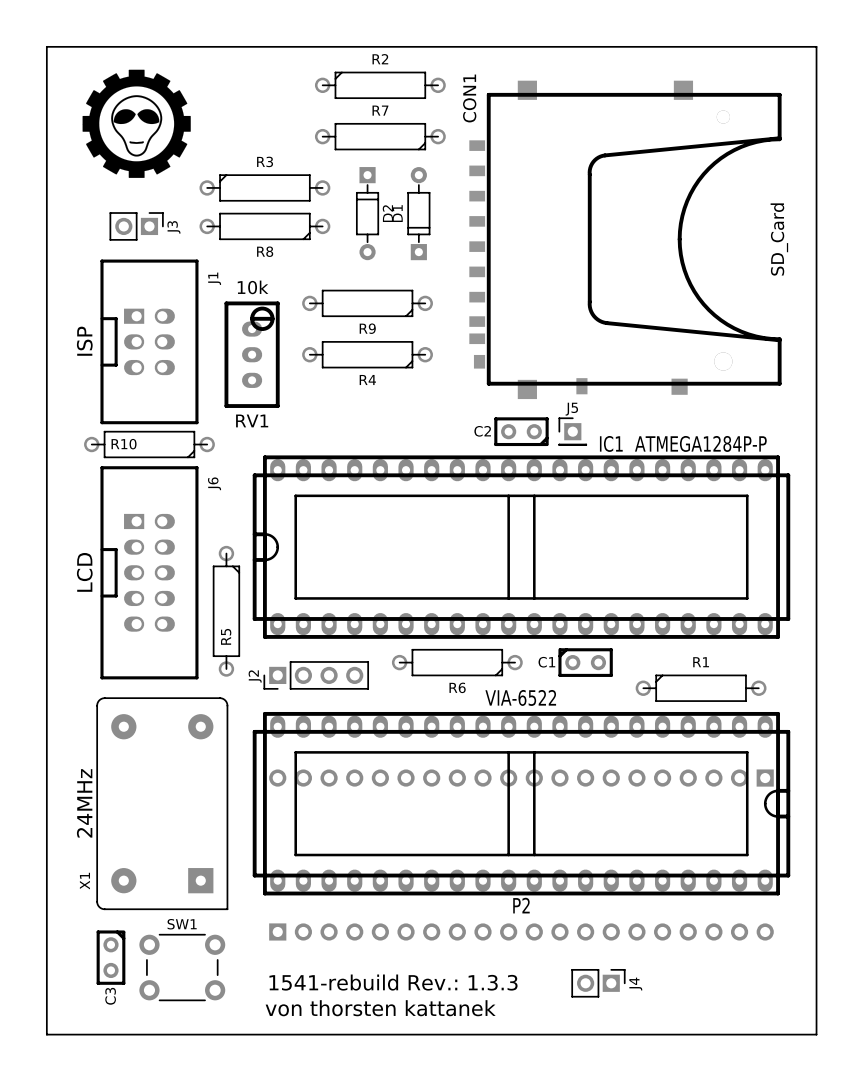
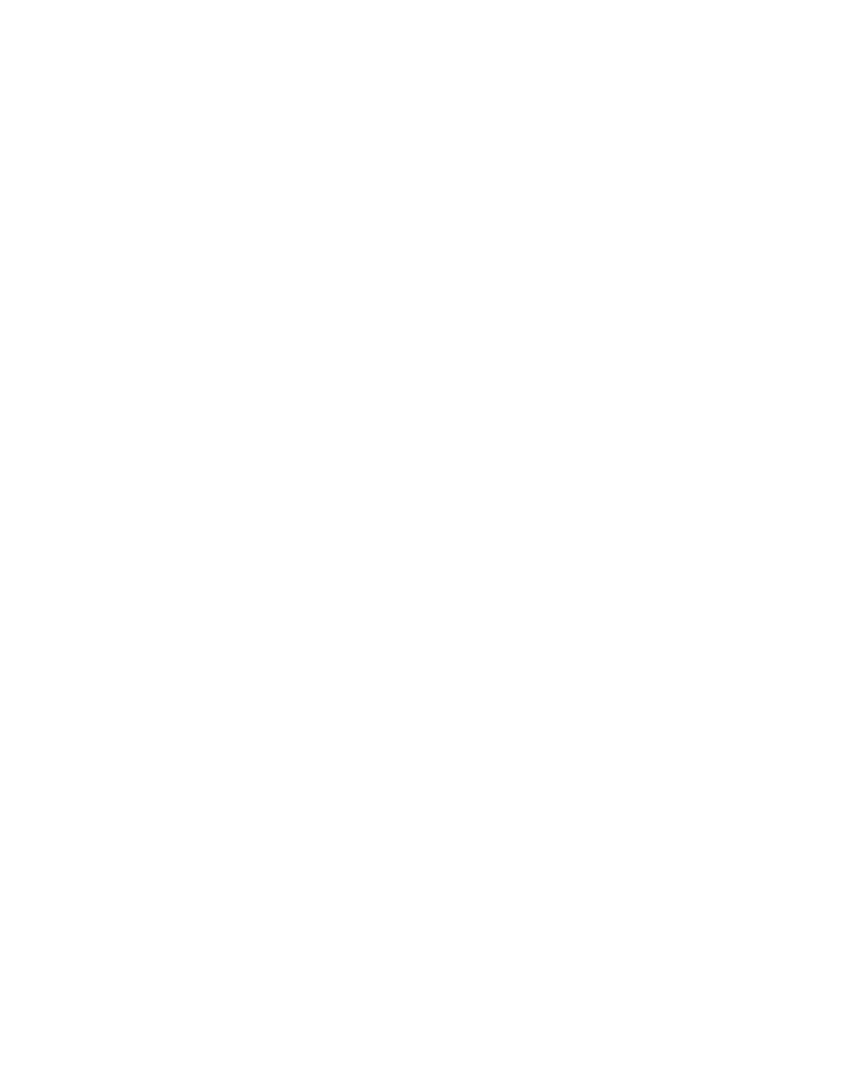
board edge: (46, 46) (816, 46) (816, 1034) (46, 1034) (46, 46) -> none
drawing: [82, 69, 191, 178] -> none
R2: (380, 85) -> none
R7: (380, 136) -> none
R3: (264, 187) -> none
D2: (367, 213) -> none
D1: (418, 213) -> none
J3: (136, 226) -> none
R8: (264, 226) -> none
CON1: SD_Card (625, 239) -> none
R9: (367, 303) -> none
text: ISP (84, 341) -> none
J1: (149, 341) -> none
RV1: 10k (252, 354) -> none
R4: (367, 354) -> none
C2: (521, 431) -> none
J5: (572, 431) -> none
R10: (149, 444) -> none
IC1: ATMEGA1284P-P (521, 547) -> none
text: LCD (84, 572) -> none
J6: (149, 572) -> none
R5: (226, 611) -> none
R6: (457, 662) -> none
C1: (585, 662) -> none
J2: (316, 675) -> none
R1: (701, 688) -> none
part: (521, 778) -> none
text: 24MHz (84, 803) -> none
X1: (162, 803) -> none
P2: VIA-6522 (521, 803) -> none
part: (521, 931) -> none
C3: (110, 957) -> none
SW1: (182, 967) -> none
text: 1541-rebuild Rev.: 1.3.3 (393, 982) -> none
J4: (598, 983) -> none
text: von thorsten kattanek (380, 1008) -> none

